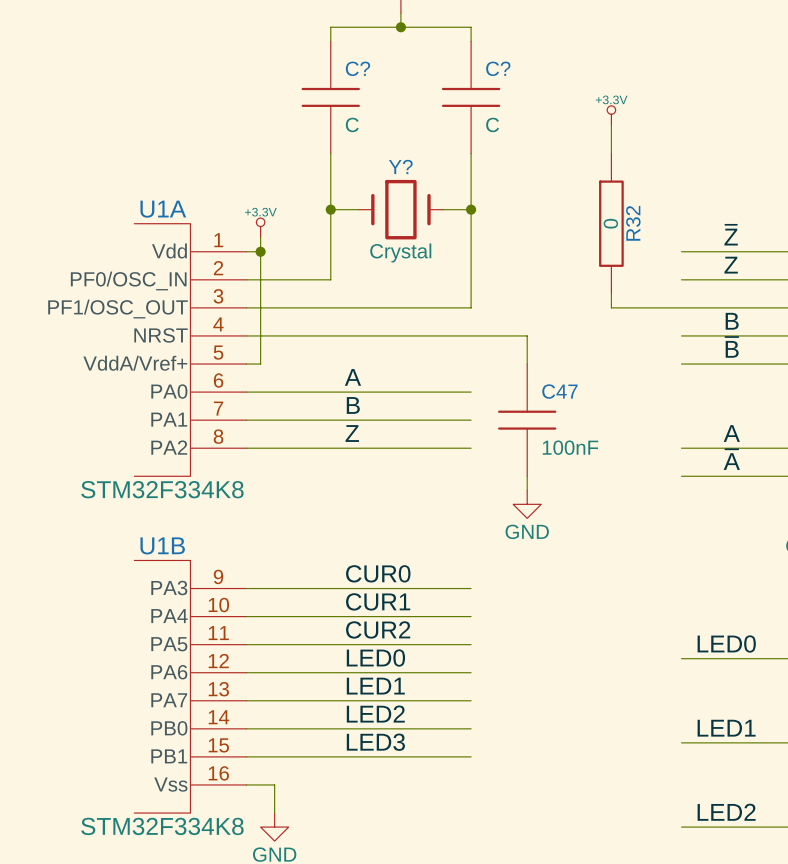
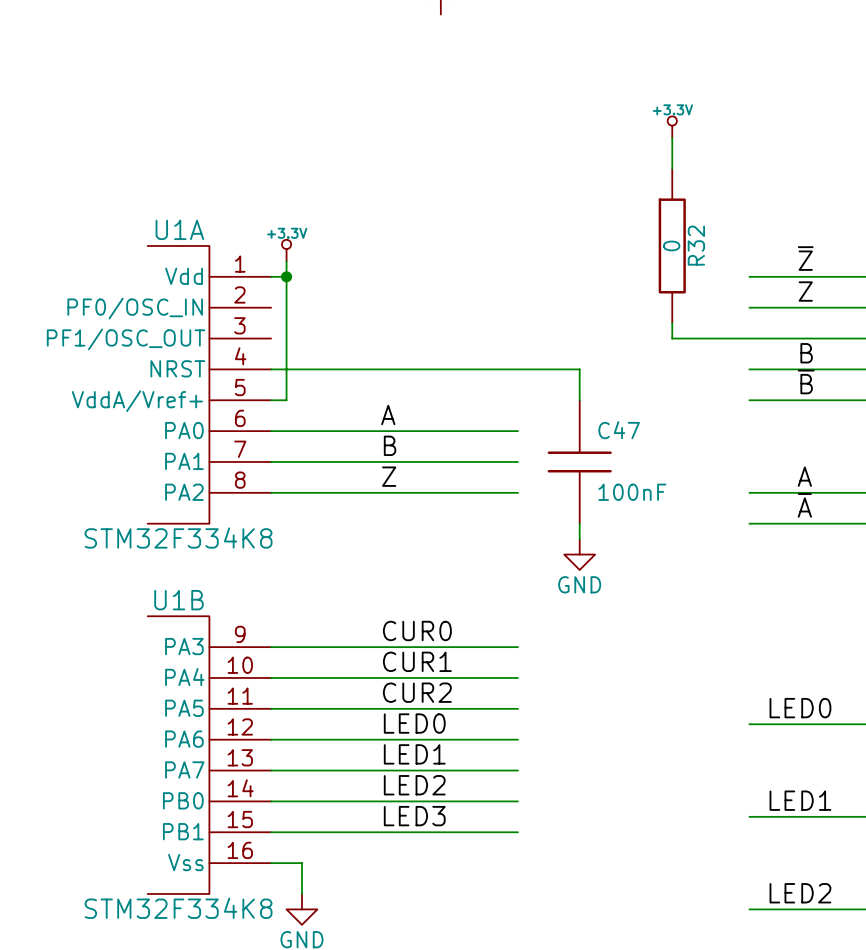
wire: (400, 13) (400, 27) -> none
junction: (400, 27) -> none
wire: (330, 41) (330, 27) (471, 27) (471, 41) -> none
C?: C (330, 97) -> none
C?: C (471, 97) -> none
wire: (330, 153) (330, 279) (246, 279) -> none
wire: (471, 153) (471, 307) (246, 307) -> none
wire: (330, 209) (358, 209) -> none
junction: (330, 209) -> none
Y?: Crystal (400, 209) -> none
wire: (443, 209) (471, 209) -> none
junction: (471, 209) -> none

